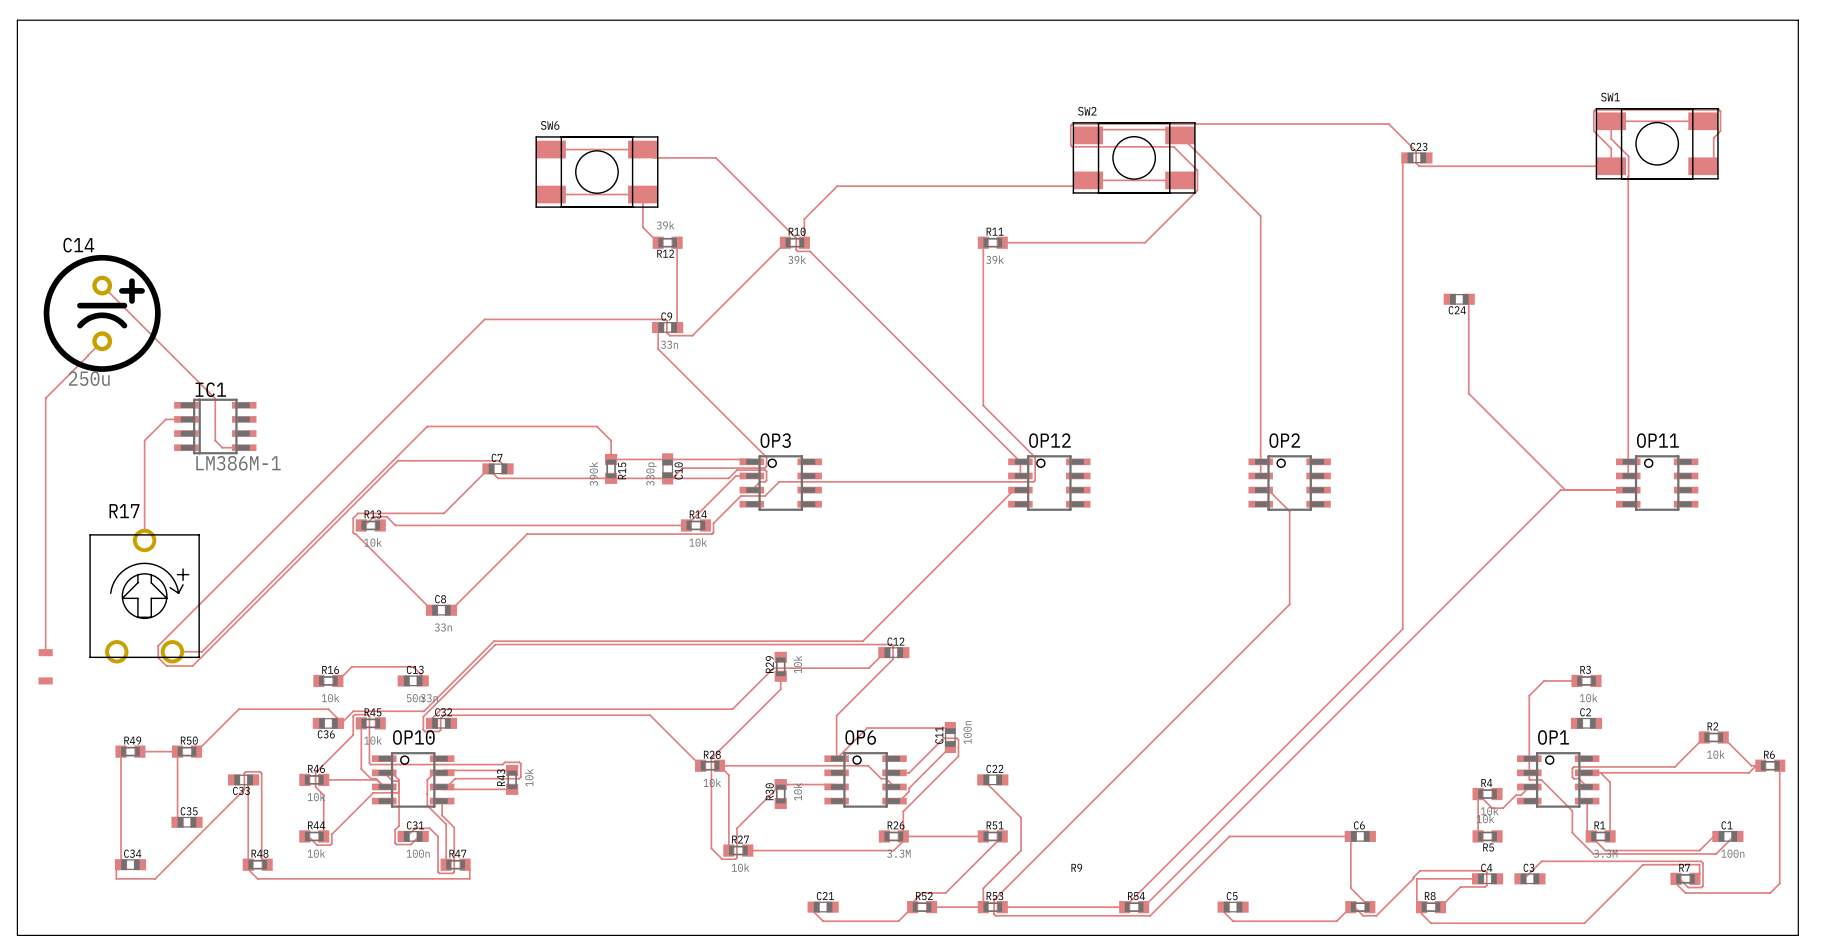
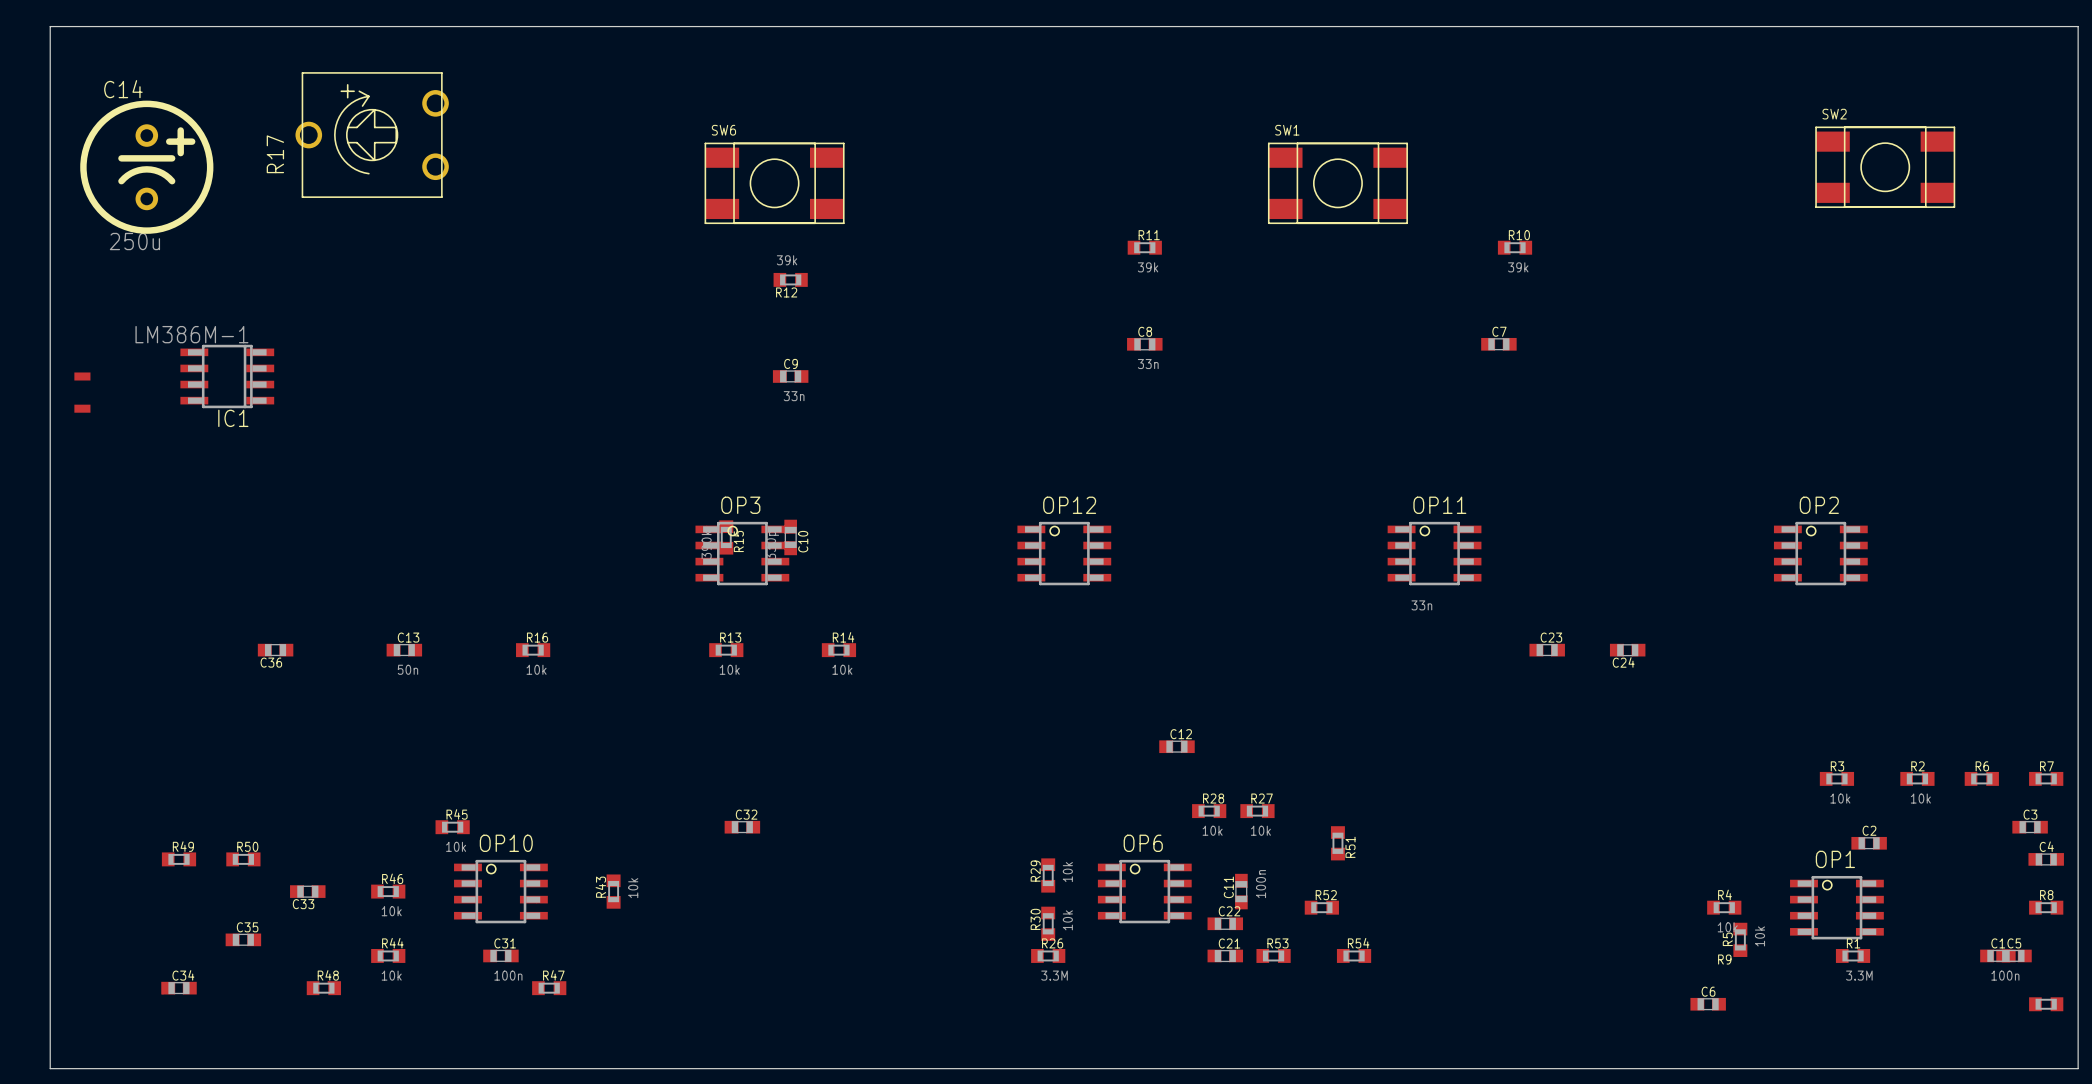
top track: (1614, 115) (1620, 121) (1703, 121) -> none
top track: (1611, 121) (1611, 138) (1628, 156) (1628, 475) -> none
top track: (1190, 129) (1093, 129) (1088, 135) -> none
top track: (1180, 135) (1260, 216) (1260, 475) -> none
SW1 position: (1657, 143) -> (1337, 183)
top track: (551, 149) (642, 149) -> none
top track: (653, 157) (715, 157) (796, 238) (797, 251) (809, 251) (1020, 461) (1020, 475) -> none
SW2 position: (1134, 157) -> (1885, 167)
top track: (1407, 157) (1402, 162) (1402, 629) (1124, 907) (1002, 907) -> none
C23 position: (1416, 157) -> (1547, 650)
top track: (1713, 157) (1713, 137) (1720, 131) (1719, 109) (1595, 109) (1593, 131) (1611, 148) (1611, 166) (1419, 166) (1416, 162) (1416, 151) (1388, 124) (1072, 124) (1072, 146) (1173, 146) (1197, 170) (1197, 190) (1145, 242) (1002, 242) -> none
SW6 position: (596, 172) -> (774, 183)
top track: (1088, 180) (1180, 180) -> none
top track: (1091, 186) (837, 186) (804, 219) (804, 242) -> none
top track: (554, 200) (560, 194) (642, 194) (642, 227) (658, 242) -> none
top track: (677, 242) (677, 327) -> none
top track: (785, 242) (692, 335) (669, 335) (666, 332) (665, 319) (484, 319) (158, 645) (158, 657) (166, 666) (192, 666) (397, 460) (499, 460) (507, 468) -> none
R10 position: (794, 242) -> (1515, 247)
top track: (983, 242) (983, 405) (1035, 457) (1033, 481) (779, 481) (765, 495) (740, 495) (713, 523) (712, 534) (527, 534) (450, 610) -> none
R11 position: (992, 242) -> (1144, 247)
top track: (102, 285) (215, 398) (215, 440) (222, 447) (244, 447) -> none
C24 position: (1459, 299) -> (1627, 650)
top track: (1468, 299) (1468, 393) (1565, 490) -> none
C14 position: (102, 313) -> (146, 167)
top track: (658, 327) (658, 349) (766, 457) (766, 466) (764, 468) (682, 468) (667, 483) (667, 478) -> none
part: none -> (82, 392)
top track: (102, 341) (45, 398) (45, 652) -> none
top track: (186, 419) (165, 419) (144, 440) (144, 540) -> none
IC1 rotation: 0° (215, 426) -> 180° (227, 376)
IC1 position: (215, 426) -> (227, 376)
top track: (751, 461) (749, 459) (611, 459) (611, 440) (596, 426) (427, 426) (202, 651) (172, 651) -> none
C7 position: (498, 468) -> (1498, 344)
top track: (751, 475) (735, 475) (686, 525) (395, 525) (386, 516) (373, 516) (364, 525) (361, 525) -> none
OP3 position: (780, 483) -> (742, 553)
OP12 position: (1049, 483) -> (1064, 553)
OP2 position: (1289, 483) -> (1820, 553)
OP11 position: (1657, 483) -> (1434, 553)
top track: (751, 490) (760, 481) (766, 480) (765, 470) (737, 470) (728, 478) (498, 478) (488, 468) (444, 513) (358, 513) (353, 518) (353, 532) (432, 610) -> none
top track: (1020, 490) (1013, 490) (862, 641) (494, 641) (423, 711) (353, 711) (341, 723) (337, 723) (337, 718) (328, 709) (238, 709) (196, 751) -> none
top track: (1260, 490) (1268, 490) (1289, 511) (1289, 604) (994, 899) (994, 914) (1150, 915) (1229, 836) (1350, 836) (1350, 888) (1369, 907) -> none
top track: (1628, 490) (1560, 490) (1143, 907) -> none
R13 position: (370, 525) -> (726, 650)
R14 position: (695, 525) -> (838, 650)
R17 rotation: 0° (144, 596) -> 90° counterclockwise (372, 135)
R17 position: (144, 596) -> (372, 135)
C8 position: (441, 610) -> (1144, 344)
top track: (884, 652) (868, 668) (773, 668) (732, 709) (441, 709) (432, 718) (432, 723) -> none
C12 position: (893, 652) -> (1176, 746)
part: (45, 666) -> none
R29 position: (780, 666) -> (1048, 875)
top track: (780, 676) (780, 689) (711, 758) (711, 848) (722, 859) (735, 859) (736, 828) (780, 784) (834, 784) (836, 786) -> none
R16 position: (328, 680) -> (533, 650)
top track: (337, 680) (351, 666) (413, 666) (422, 676) (422, 680) -> none
C13 position: (413, 680) -> (404, 650)
top track: (1577, 680) (1544, 680) (1529, 695) (1529, 779) (1541, 779) (1572, 810) (1572, 832) (1593, 853) (1716, 853) (1733, 836) (1737, 836) -> none
C36 position: (328, 723) -> (275, 650)
top track: (361, 723) (361, 769) (370, 778) (376, 778) (384, 786) -> none
C32 position: (441, 723) -> (742, 827)
C2 position: (1586, 723) -> (1869, 843)
top track: (950, 728) (867, 728) (836, 758) (836, 715) (893, 659) (891, 644) (495, 644) (423, 716) (424, 731) (439, 731) (440, 718) (443, 715) (650, 715) (700, 765) -> none
C11 position: (950, 737) -> (1241, 891)
top track: (1704, 737) (1674, 766) (1573, 766) (1572, 777) (1578, 778) (1587, 786) -> none
R2 position: (1713, 737) -> (1917, 778)
top track: (1723, 737) (1751, 765) (1760, 765) -> none
top track: (950, 746) (909, 788) (909, 791) (899, 801) (894, 801) -> none
top track: (121, 751) (121, 864) -> none
top track: (139, 751) (177, 751) (177, 822) -> none
R28 position: (710, 765) -> (1209, 811)
top track: (1756, 765) (1749, 772) (1587, 772) -> none
R6 position: (1770, 765) -> (1981, 778)
top track: (1779, 765) (1779, 883) (1770, 892) (1685, 892) (1675, 883) (1675, 878) (1679, 878) (1688, 887) (1701, 887) (1703, 863) (1700, 861) (1541, 861) (1524, 878) (1520, 878) -> none
top track: (444, 770) (512, 770) -> none
top track: (384, 772) (392, 781) (399, 782) -> none
top track: (391, 772) (399, 779) (399, 825) (395, 829) (395, 843) (410, 844) (419, 836) -> none
top track: (434, 772) (427, 779) (427, 805) (446, 824) (446, 864) -> none
top track: (894, 772) (909, 772) (943, 738) (956, 738) (958, 756) (903, 811) (903, 836) (983, 836) -> none
top track: (1600, 772) (1610, 782) (1610, 836) -> none
top track: (253, 779) (248, 784) (248, 869) (257, 878) (469, 878) (469, 869) (465, 864) -> none
top track: (323, 779) (377, 779) -> none
OP6 position: (865, 779) -> (1144, 891)
top track: (983, 779) (1021, 817) (1021, 850) (983, 888) (983, 907) (931, 907) -> none
C22 position: (992, 779) -> (1225, 923)
OP1 position: (1558, 779) -> (1836, 907)
top track: (894, 786) (886, 778) (881, 778) (868, 765) (719, 765) (728, 775) (728, 850) -> none
top track: (1529, 786) (1521, 795) (1515, 795) (1503, 808) (1492, 808) (1478, 794) (1478, 836) -> none
top track: (512, 789) (444, 789) (455, 778) (519, 778) (520, 777) (519, 762) (504, 762) (502, 764) (370, 764) (369, 716) (354, 714) (353, 735) (315, 772) (315, 787) (323, 795) (323, 836) -> none
top track: (399, 791) (373, 792) (331, 834) (330, 845) (317, 845) (308, 836) -> none
R30 position: (780, 794) -> (1048, 923)
top track: (442, 801) (442, 815) (454, 827) (454, 871) (438, 871) (438, 836) (429, 828) (414, 828) (406, 836) -> none
top track: (1587, 801) (1587, 832) (1605, 850) (1699, 850) (1713, 836) (1718, 836) -> none
top track: (907, 836) (893, 850) (747, 850) -> none
R51 rotation: 0° (992, 836) -> 90° clockwise (1337, 843)
R51 position: (992, 836) -> (1337, 843)
top track: (1002, 836) (945, 892) (922, 892) (912, 902) (912, 907) (898, 921) (823, 921) (813, 911) (813, 907) -> none
C6 position: (1360, 836) -> (1708, 1004)
R5 rotation: 0° (1487, 836) -> 90° clockwise (1740, 939)
R5 position: (1487, 836) -> (1740, 939)
R27 position: (738, 850) -> (1257, 811)
top track: (261, 859) (261, 773) (245, 771) (244, 789) (155, 878) (116, 878) (116, 869) -> none
top track: (1478, 878) (1416, 878) (1416, 902) (1421, 907) (1421, 913) (1431, 923) (1584, 923) (1643, 864) (1699, 864) (1699, 874) (1694, 878) -> none
C4 position: (1487, 878) -> (2046, 859)
C3 position: (1529, 878) -> (2030, 827)
R7 position: (1685, 878) -> (2046, 778)
C21 position: (823, 907) -> (1225, 955)
R52 position: (922, 907) -> (1321, 907)
R53 position: (992, 907) -> (1273, 955)
R54 position: (1134, 907) -> (1354, 955)
top track: (1223, 907) (1223, 911) (1233, 921) (1336, 921) (1350, 907) (1354, 907) (1363, 915) (1376, 915) (1420, 870) (1486, 872) (1485, 886) (1460, 886) (1440, 907) -> none
C5 position: (1233, 907) -> (2014, 955)
R9 position: (1360, 907) -> (2046, 1004)
R8 position: (1431, 907) -> (2046, 907)

